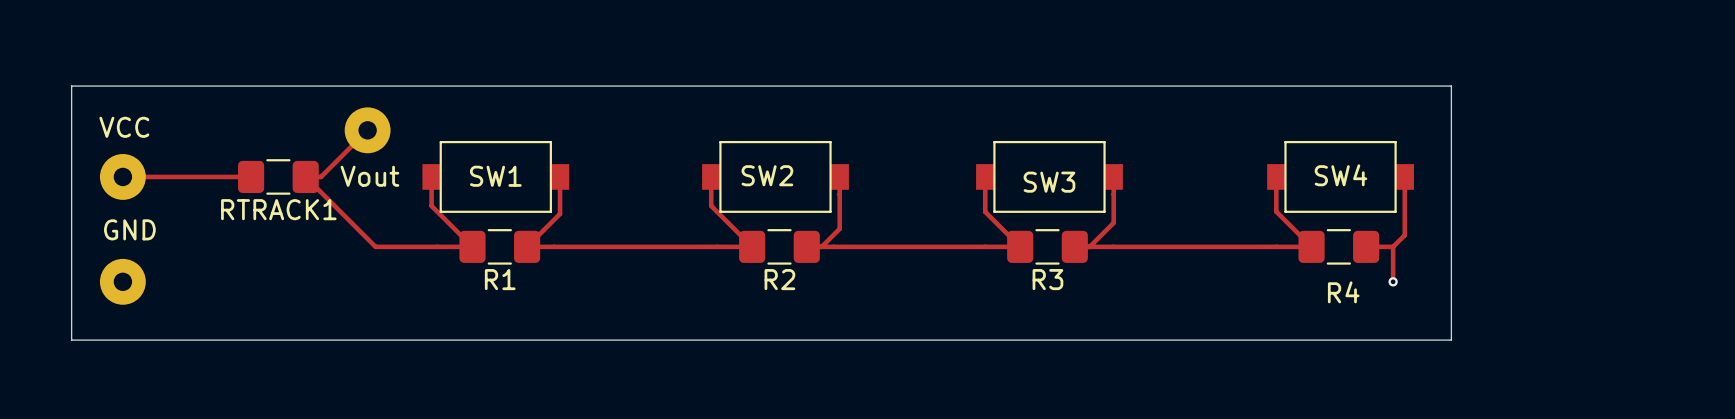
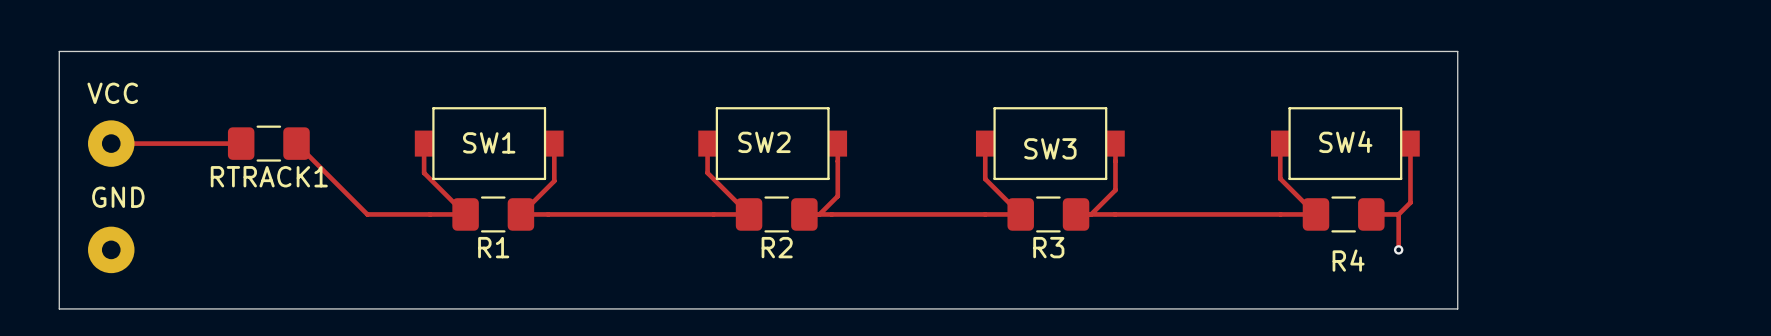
track: (367, 130) (321, 176) (305, 176) -> none
Vout: (367, 130) -> none

